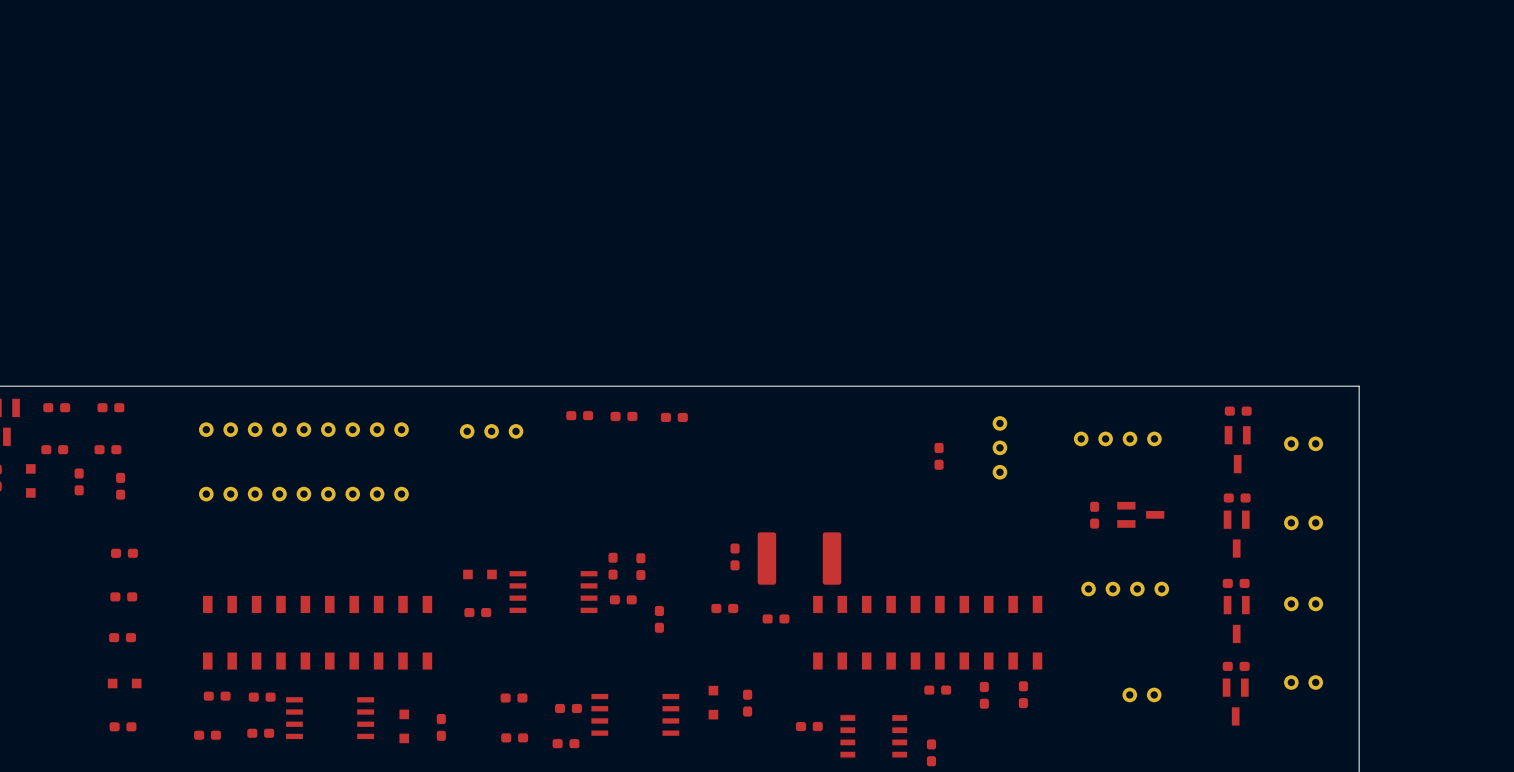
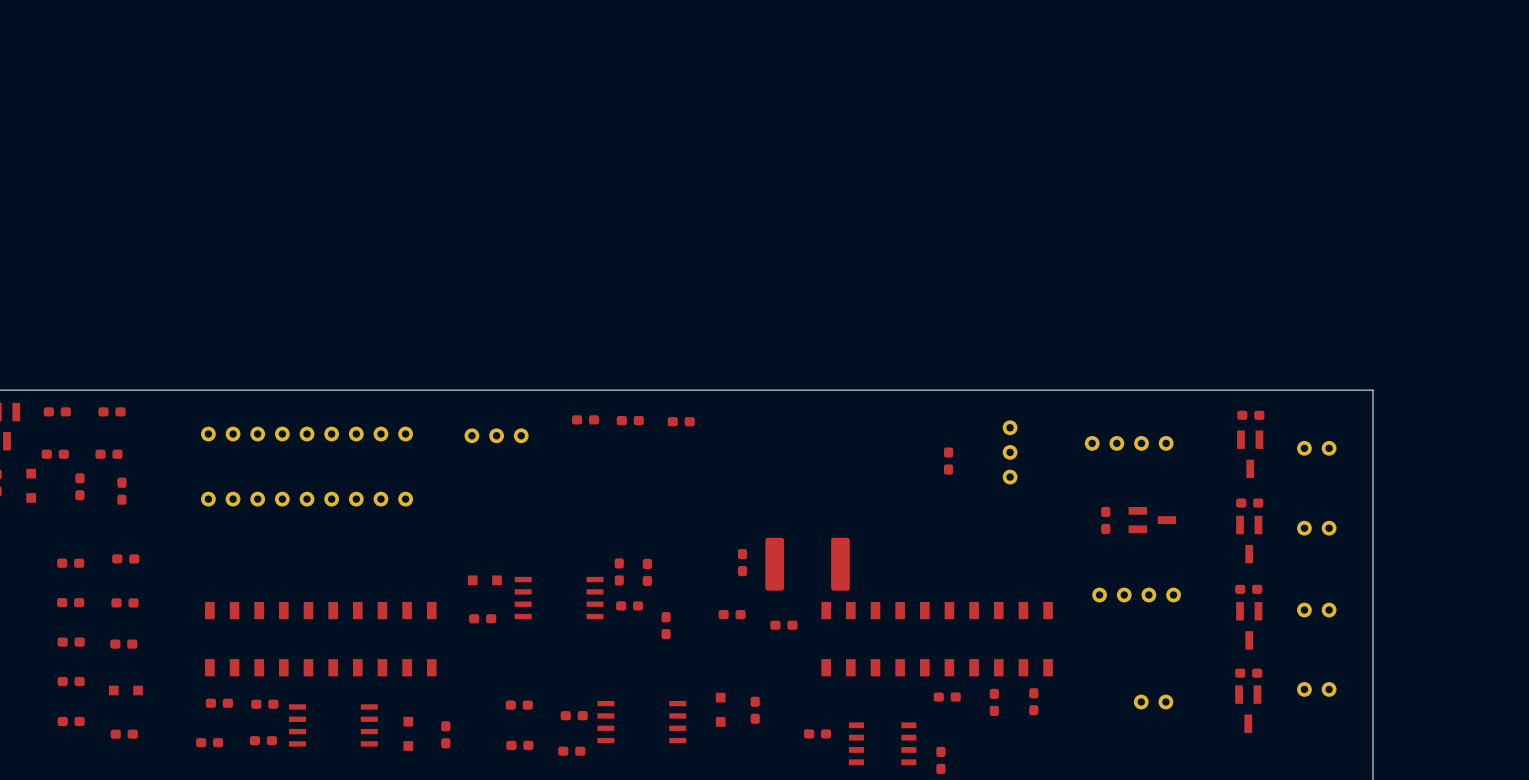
part: none -> (70, 563)
part: none -> (70, 602)
part: none -> (71, 642)
part: none -> (71, 681)
part: none -> (71, 721)

